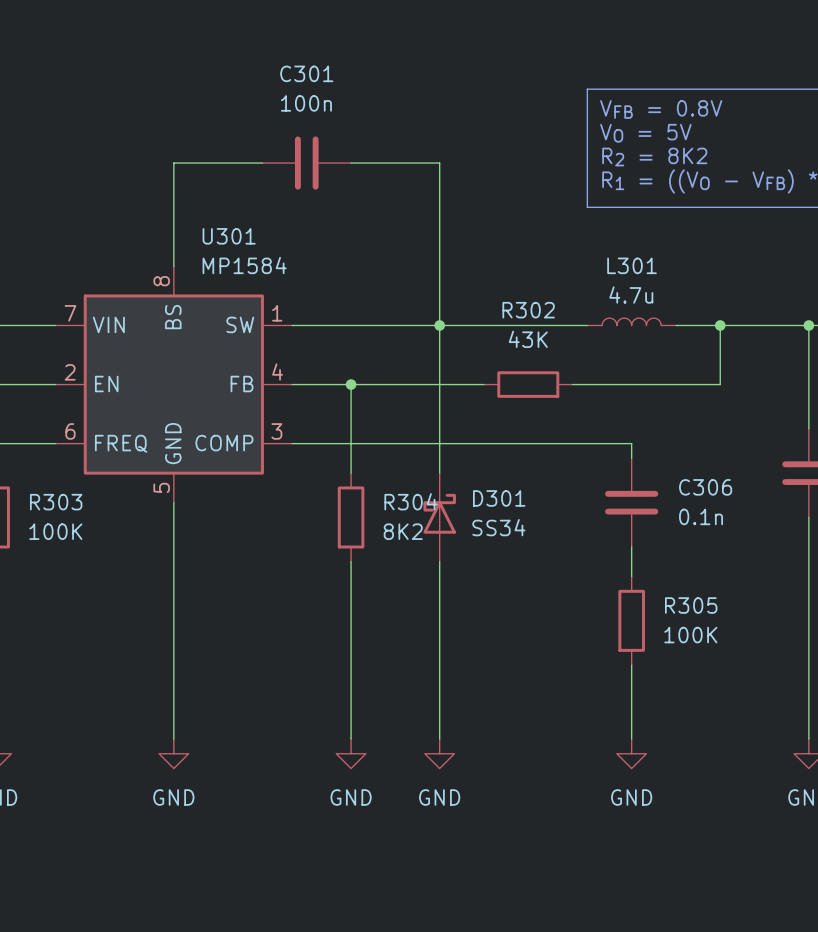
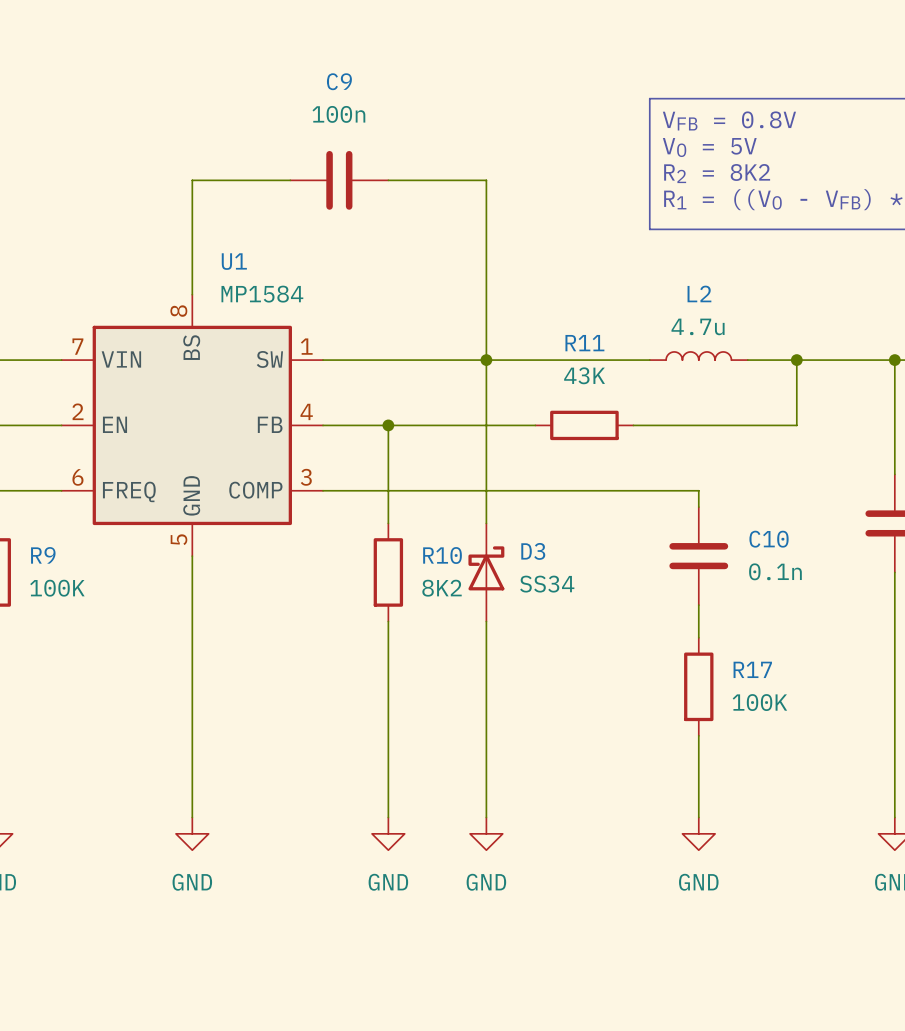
C301 name: C301 (306, 73) -> C9 (339, 81)
U301 name: U301 (229, 236) -> U1 (234, 261)
L301 name: L301 (632, 265) -> L2 (699, 293)
R302 name: R302 (528, 310) -> R11 (584, 343)
C306 name: C306 (705, 487) -> C10 (769, 539)
D301 name: D301 (499, 498) -> D3 (533, 551)
R304 name: R304 (410, 501) -> R10 (442, 555)
R303 name: R303 (56, 502) -> R9 (43, 555)
R305 name: R305 (691, 605) -> R17 (752, 669)

